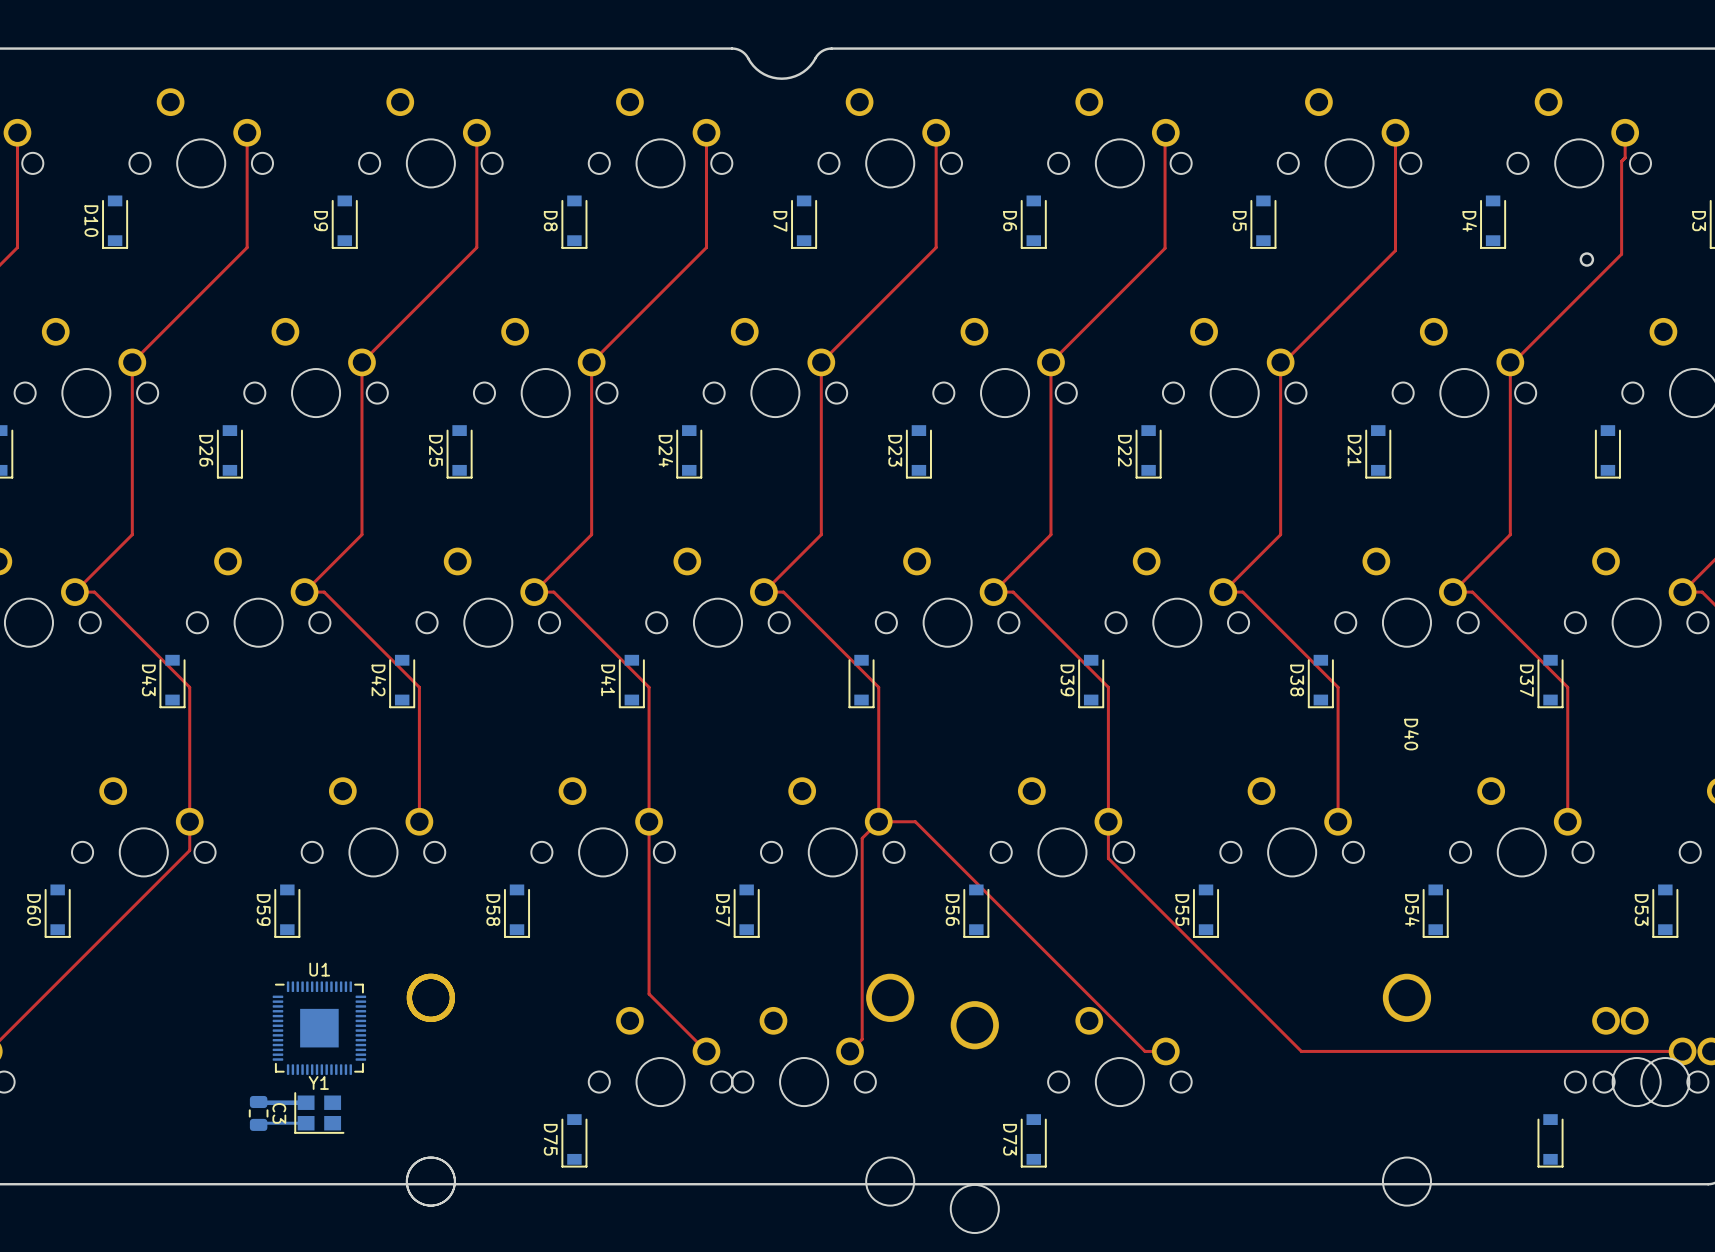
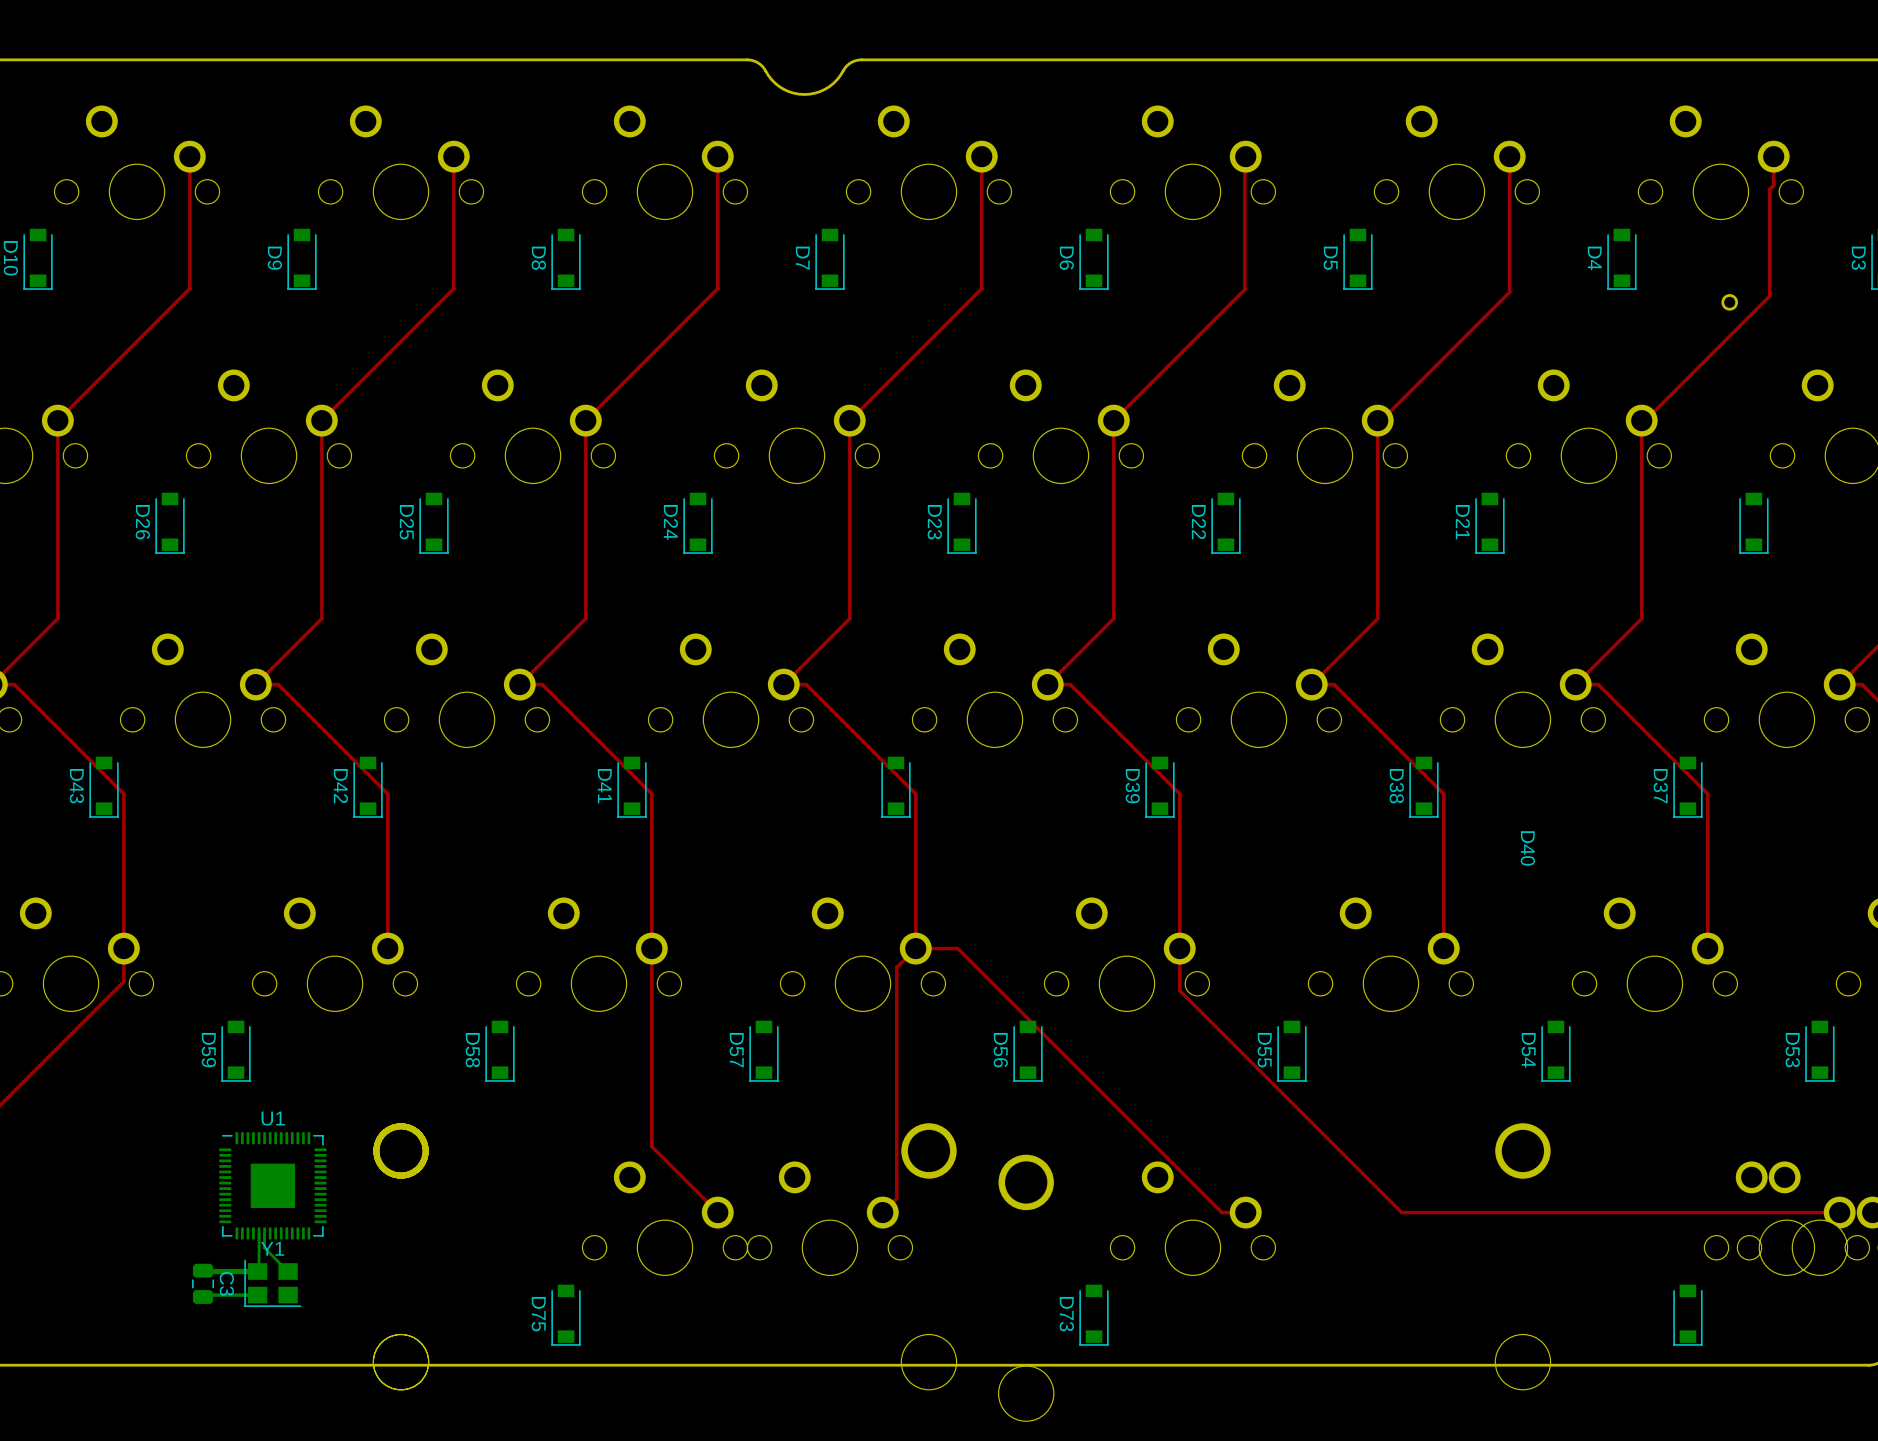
bottom track: none -> (259, 1233) (257, 1271)
bottom track: none -> (264, 1233) (264, 1248) (288, 1271) (282, 1271)

